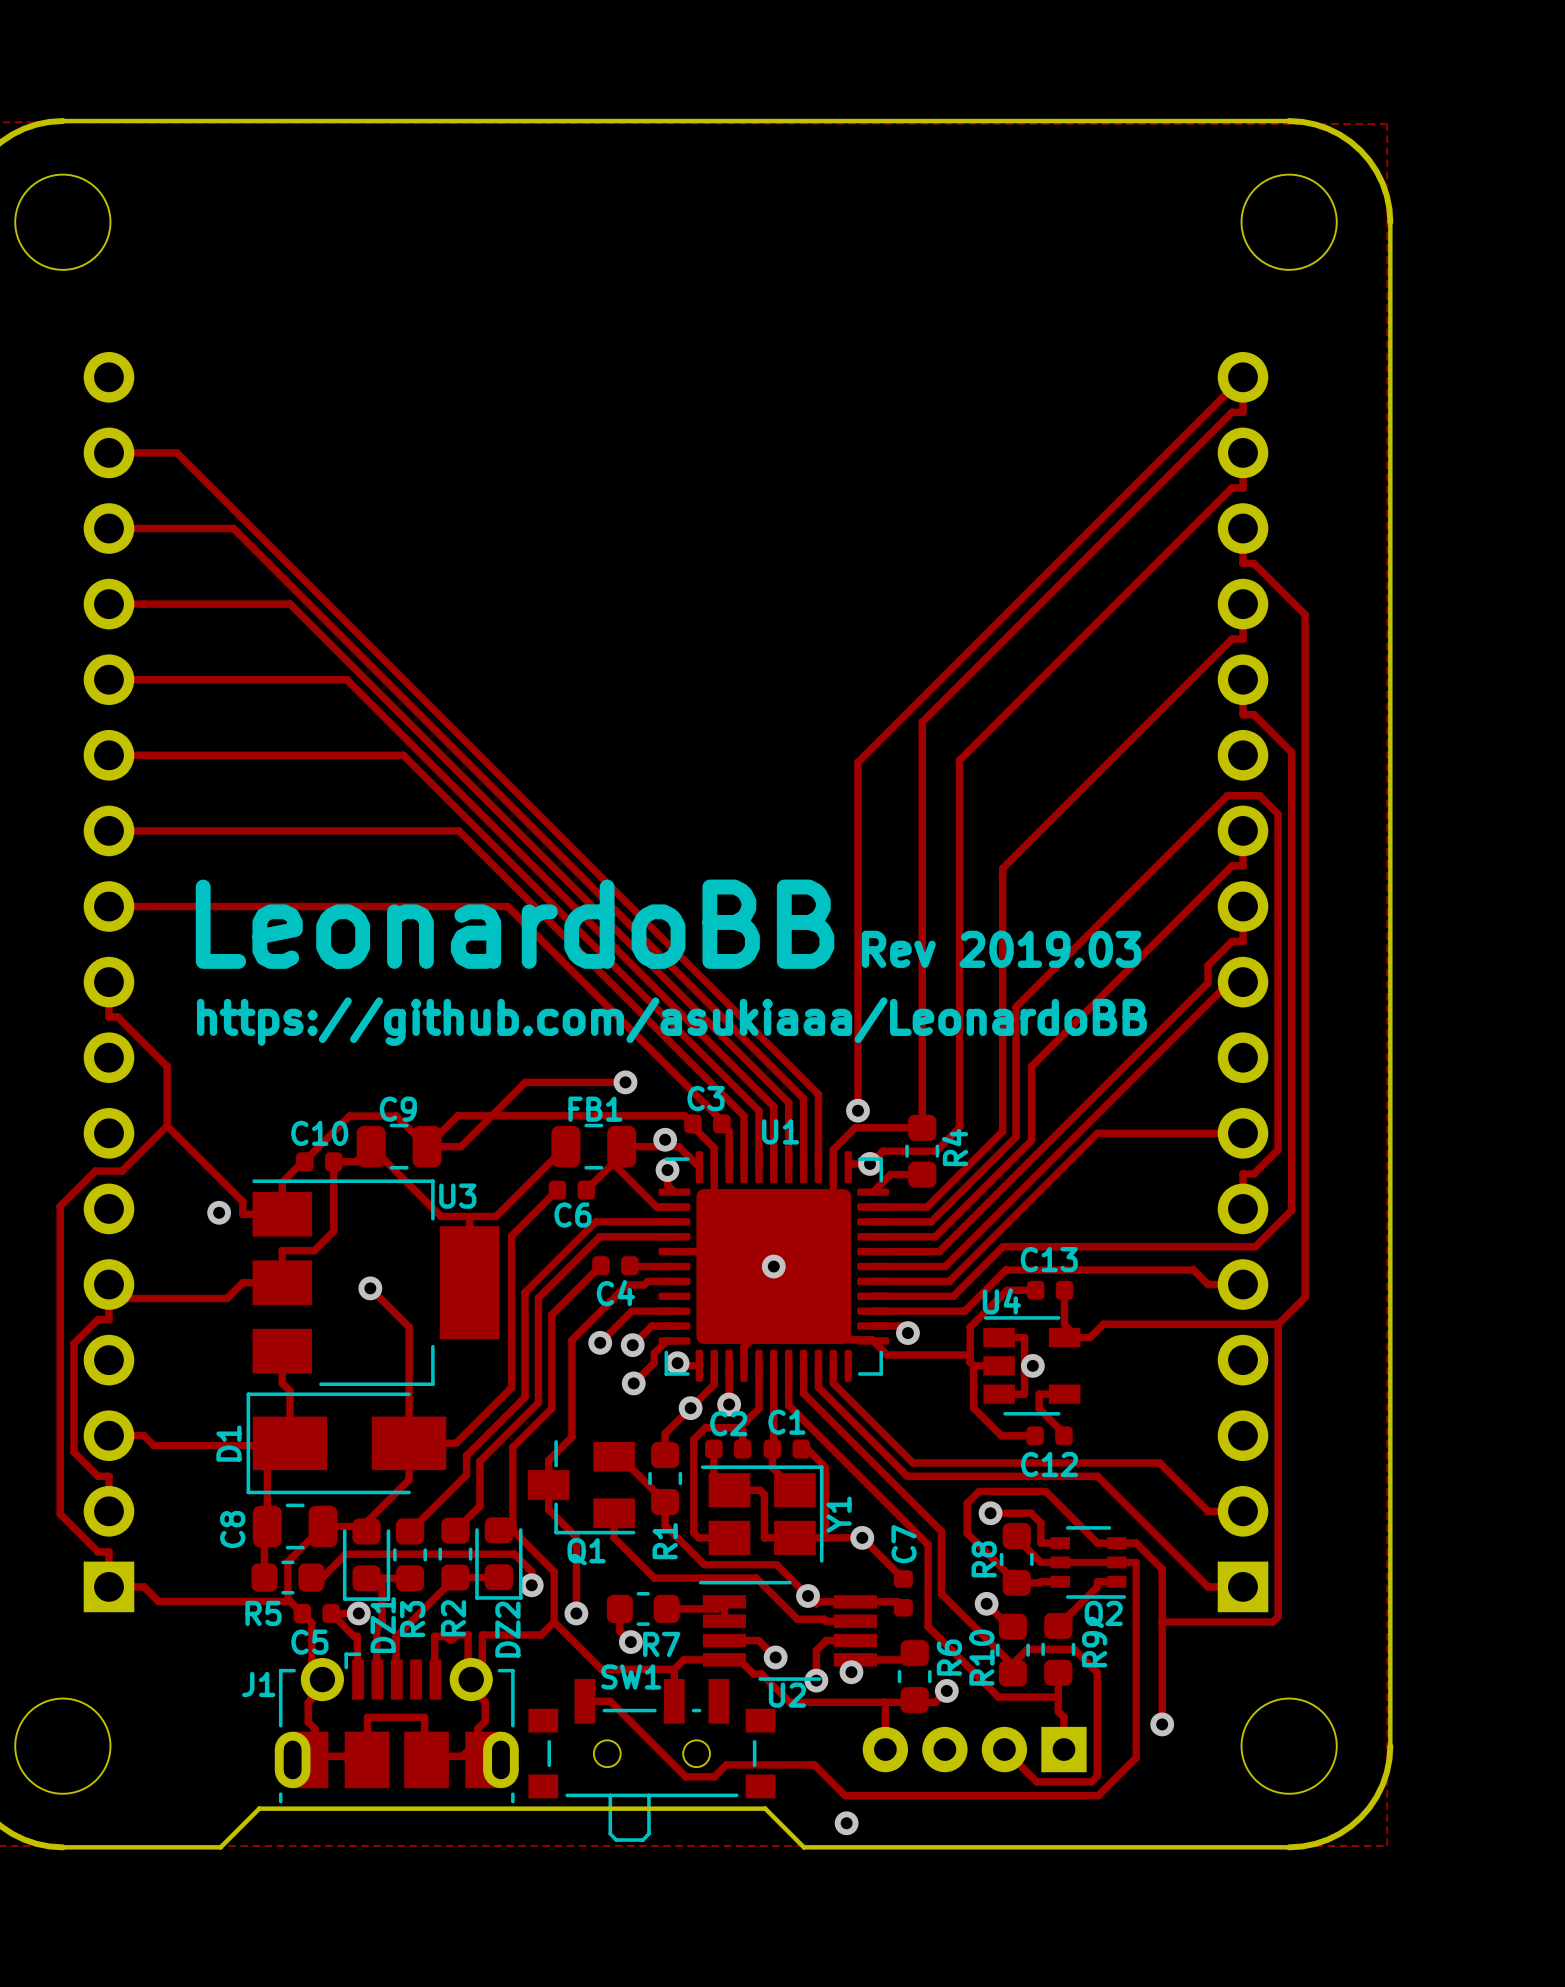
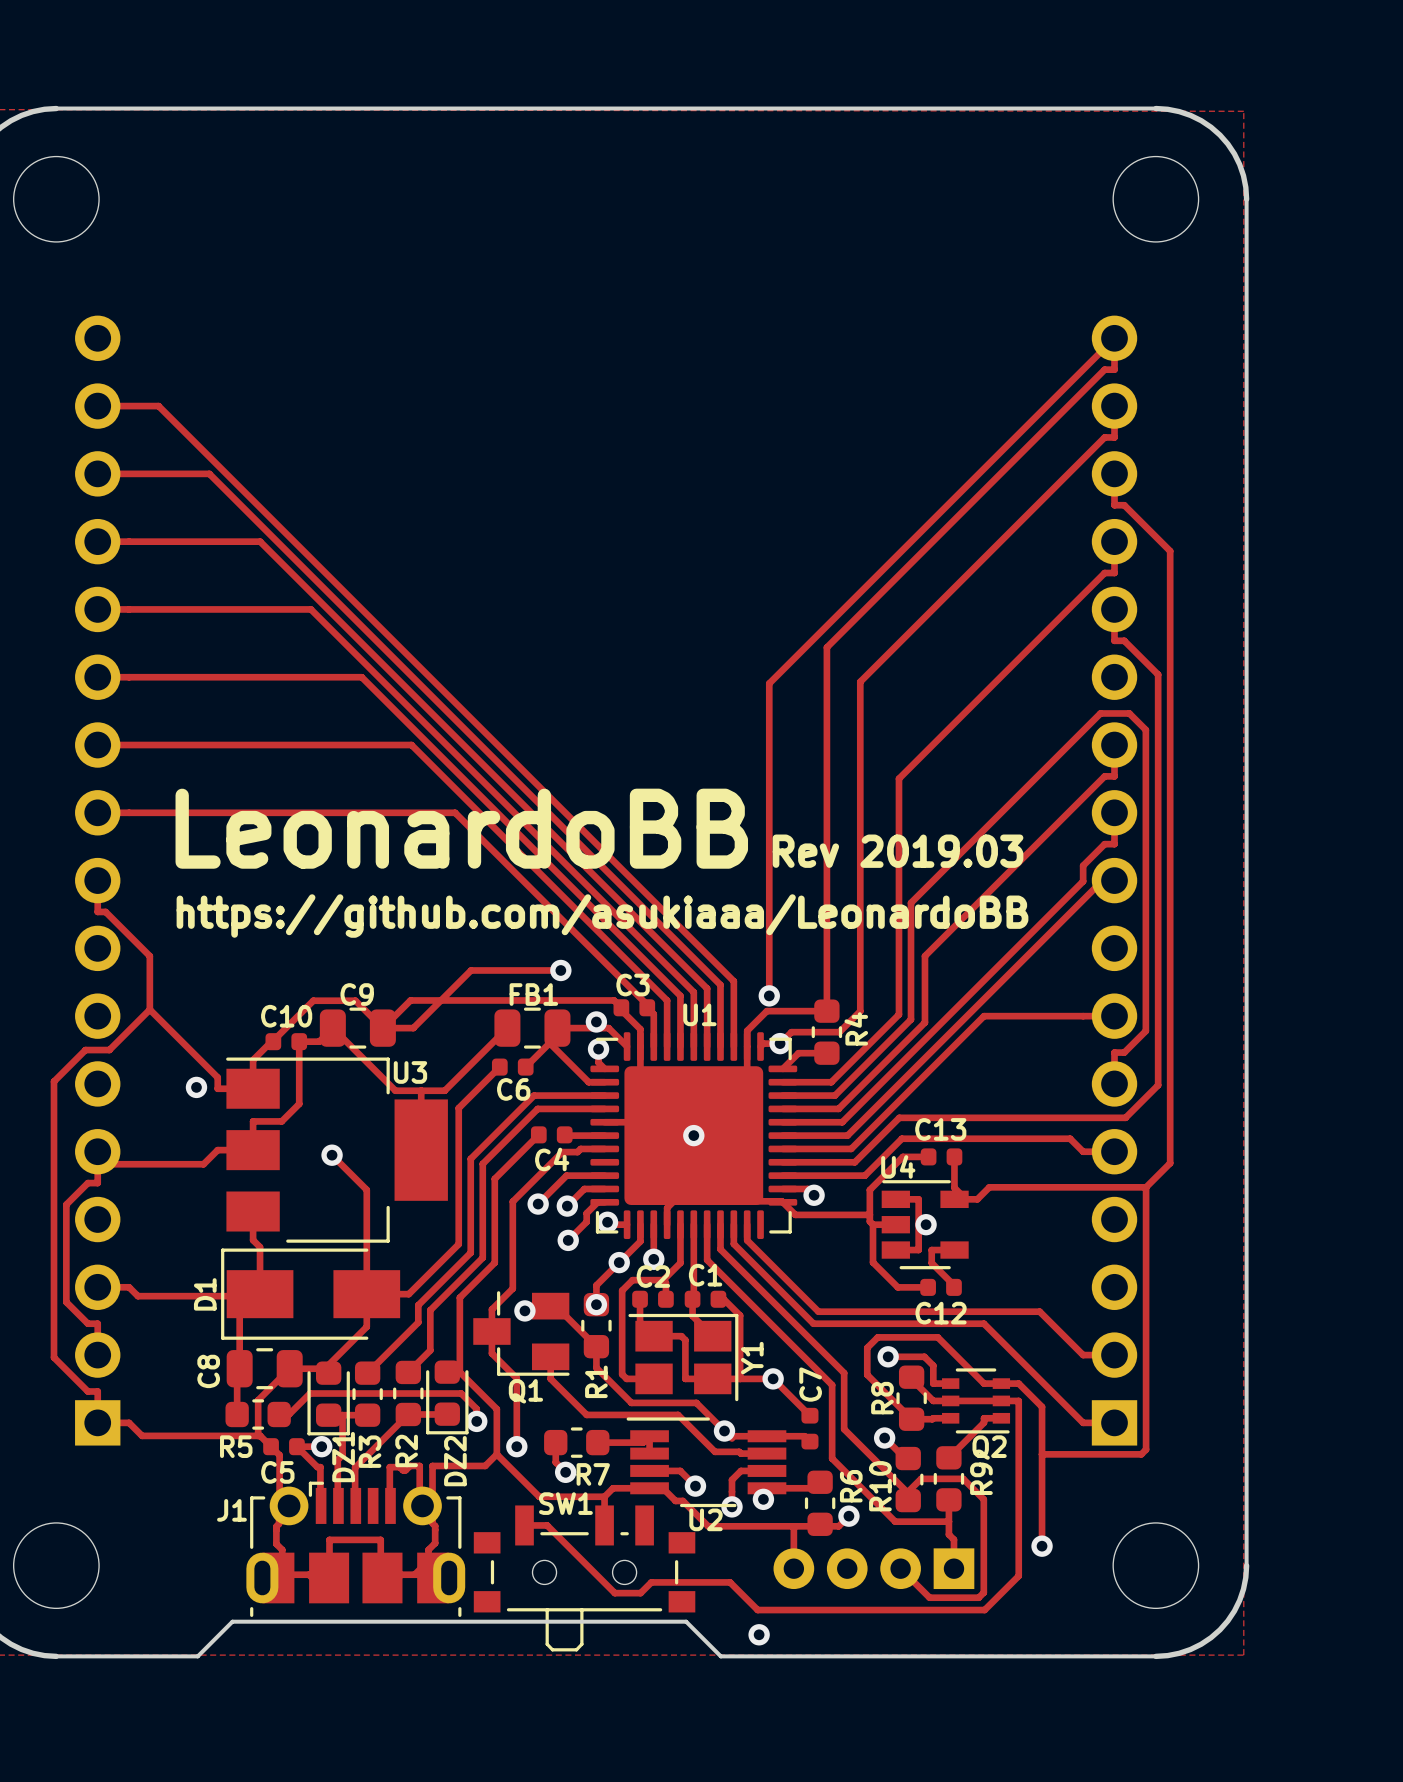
via: none -> (596, 1304)
via: none -> (524, 1310)

